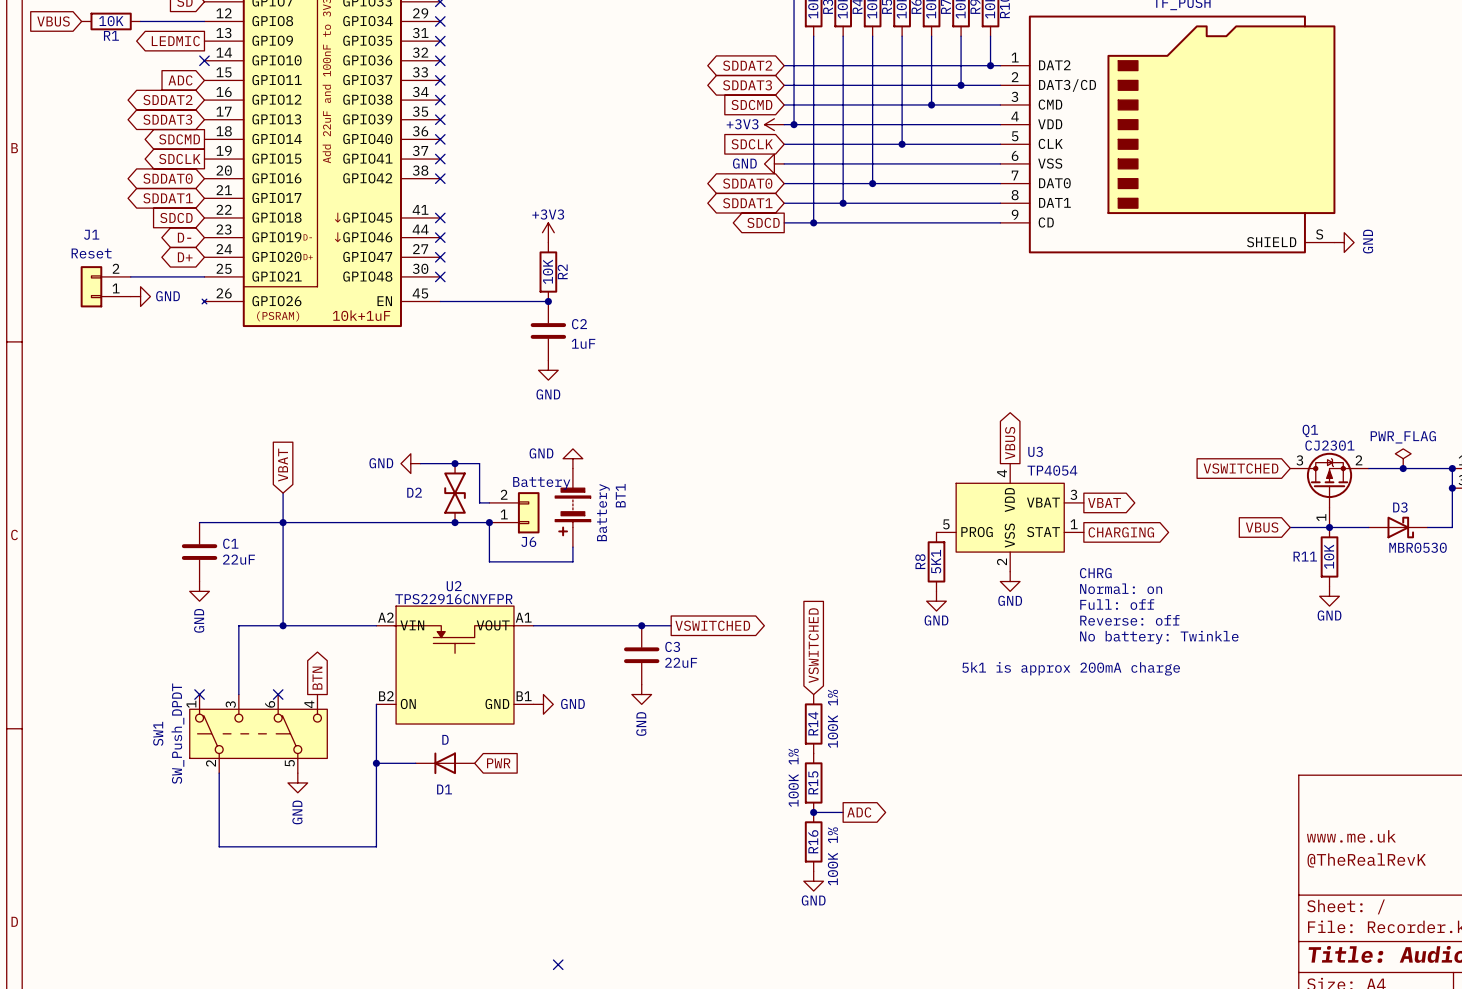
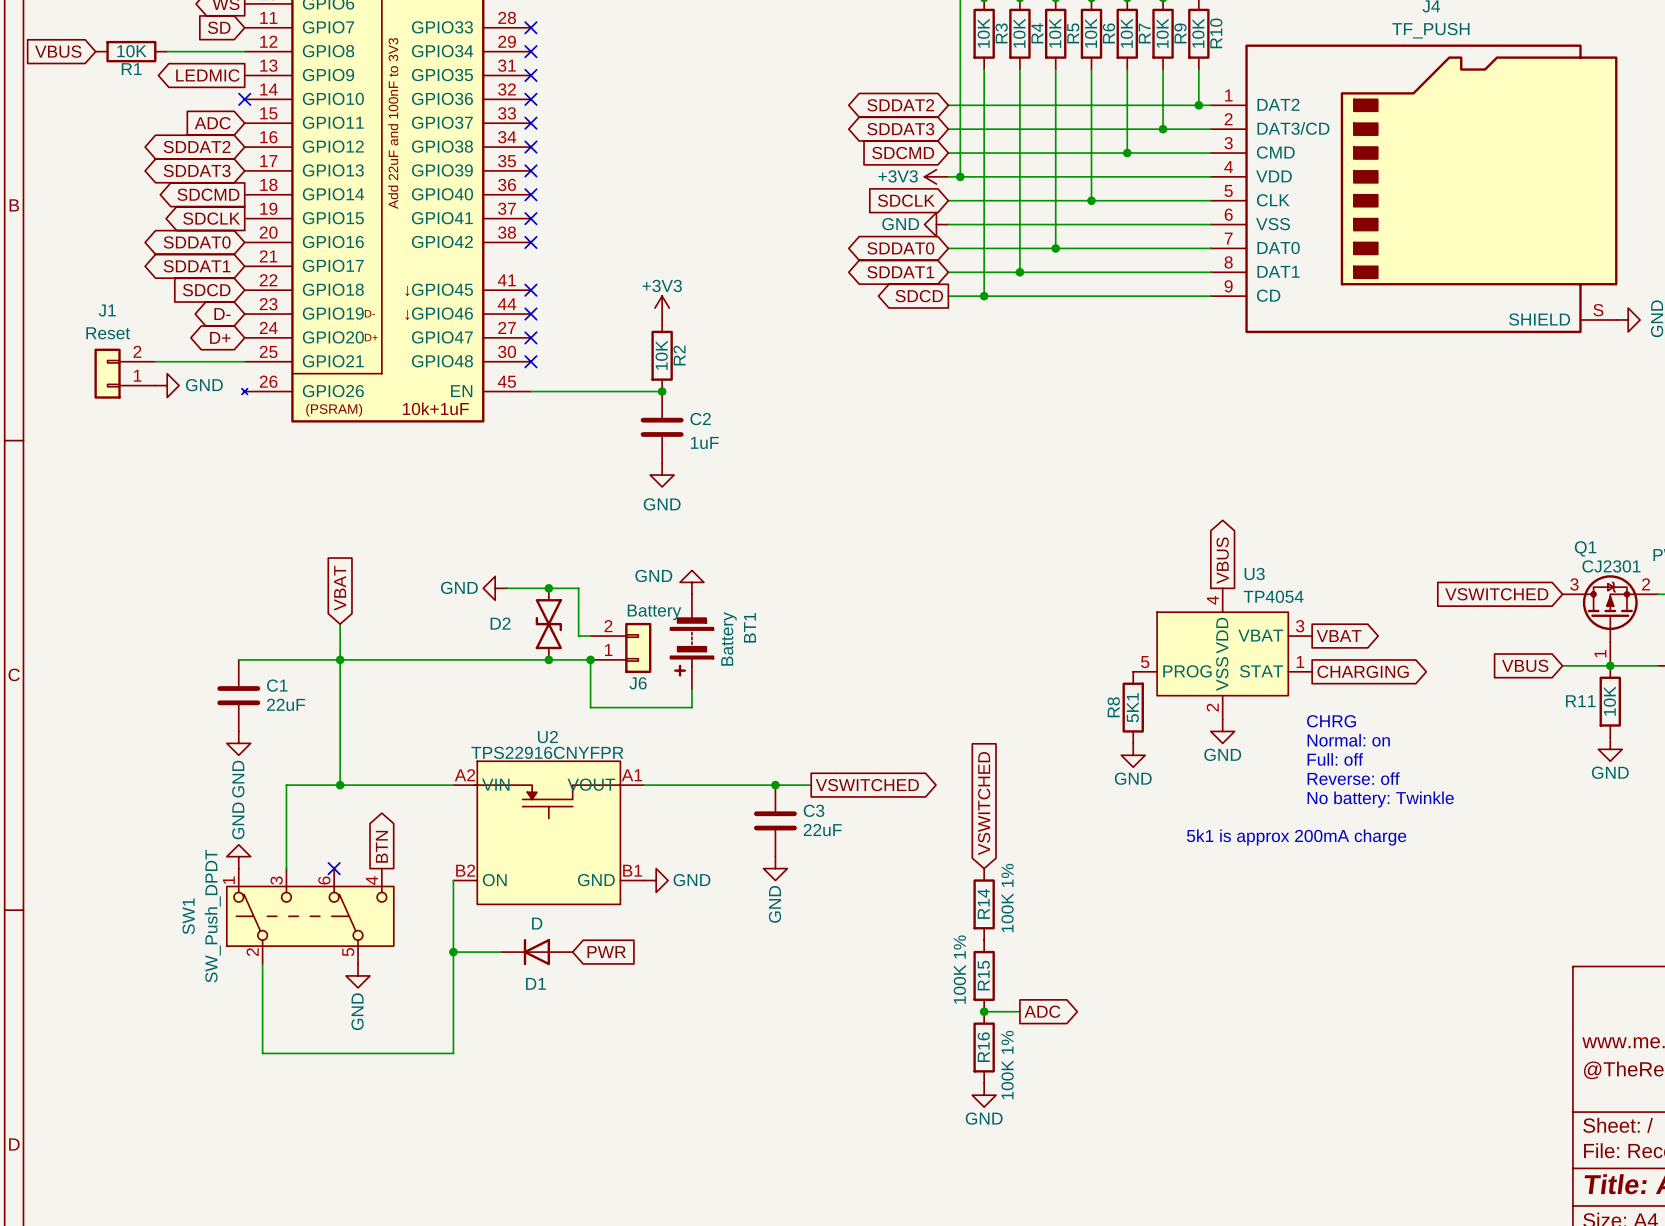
power symbol: none -> GND (238, 856)
no-connect mark: (199, 694) -> none
no-connect mark: (558, 964) -> none

